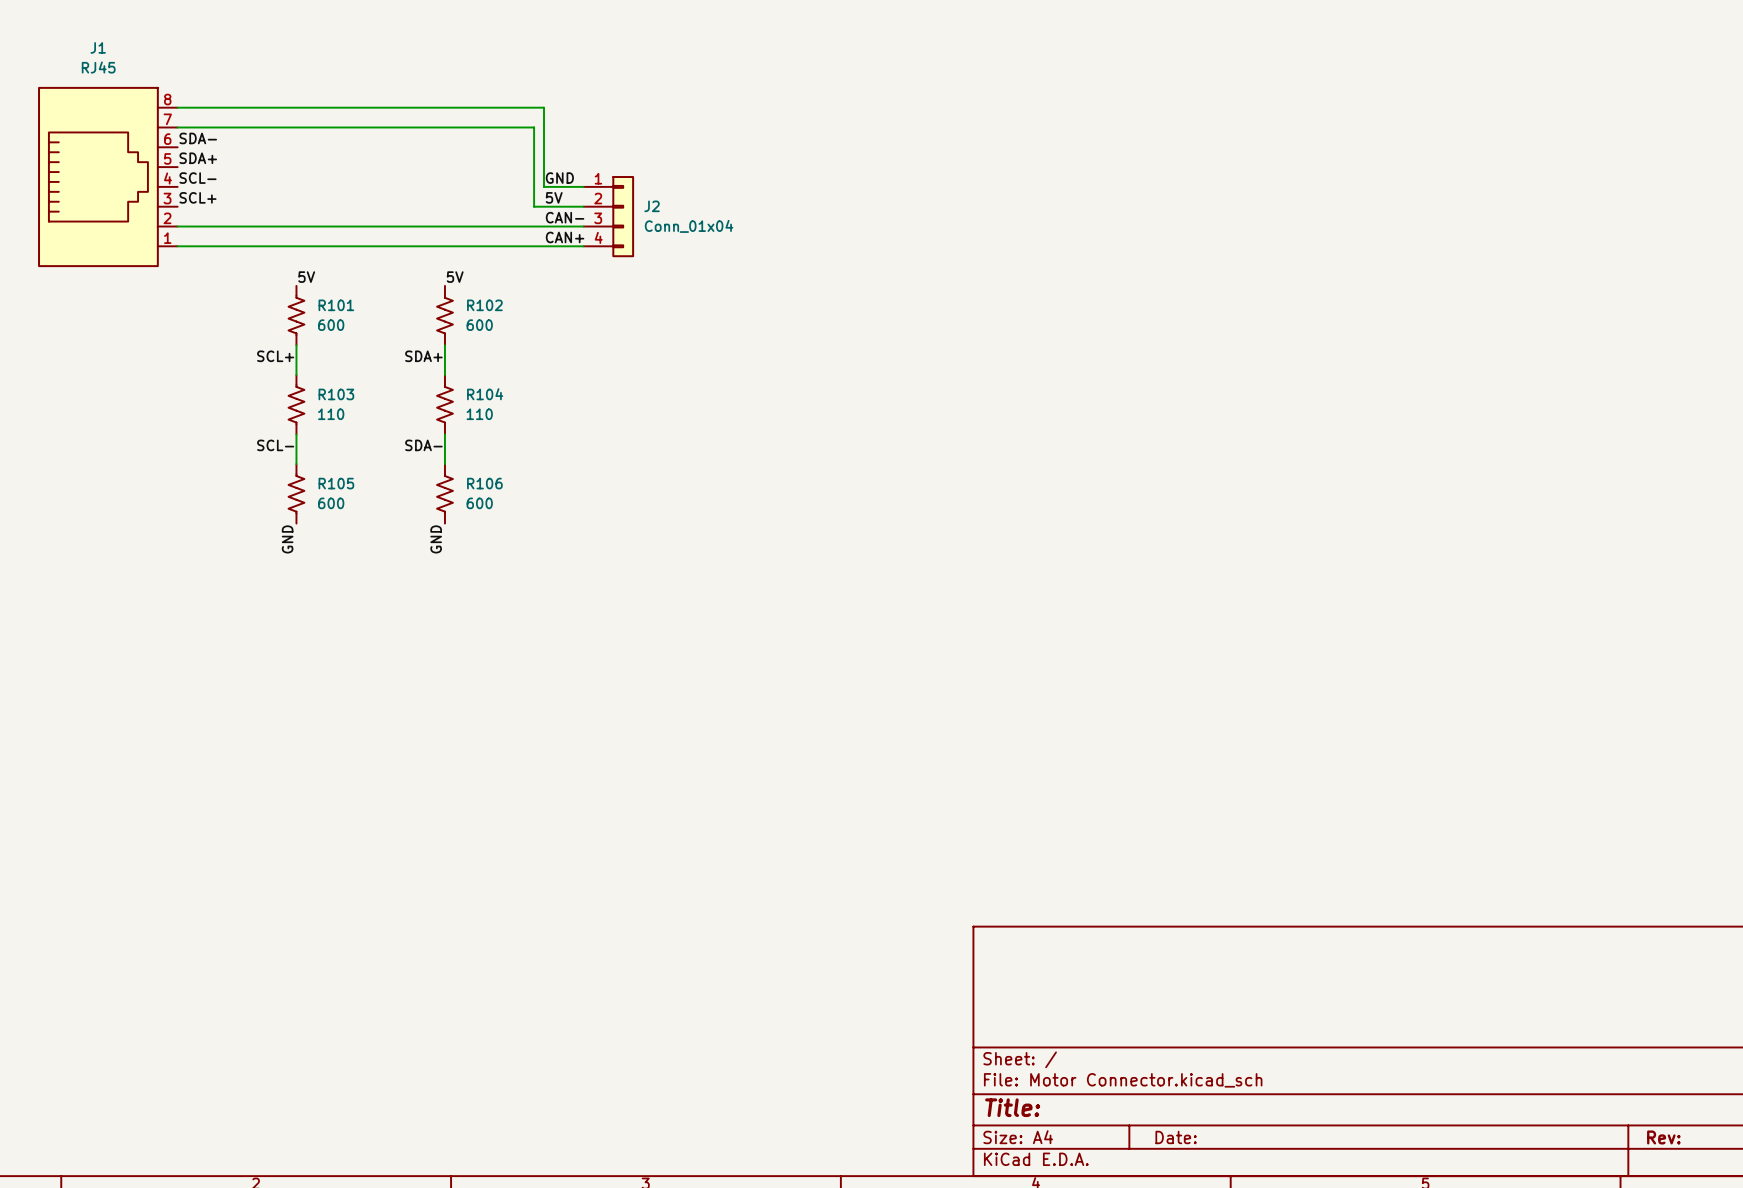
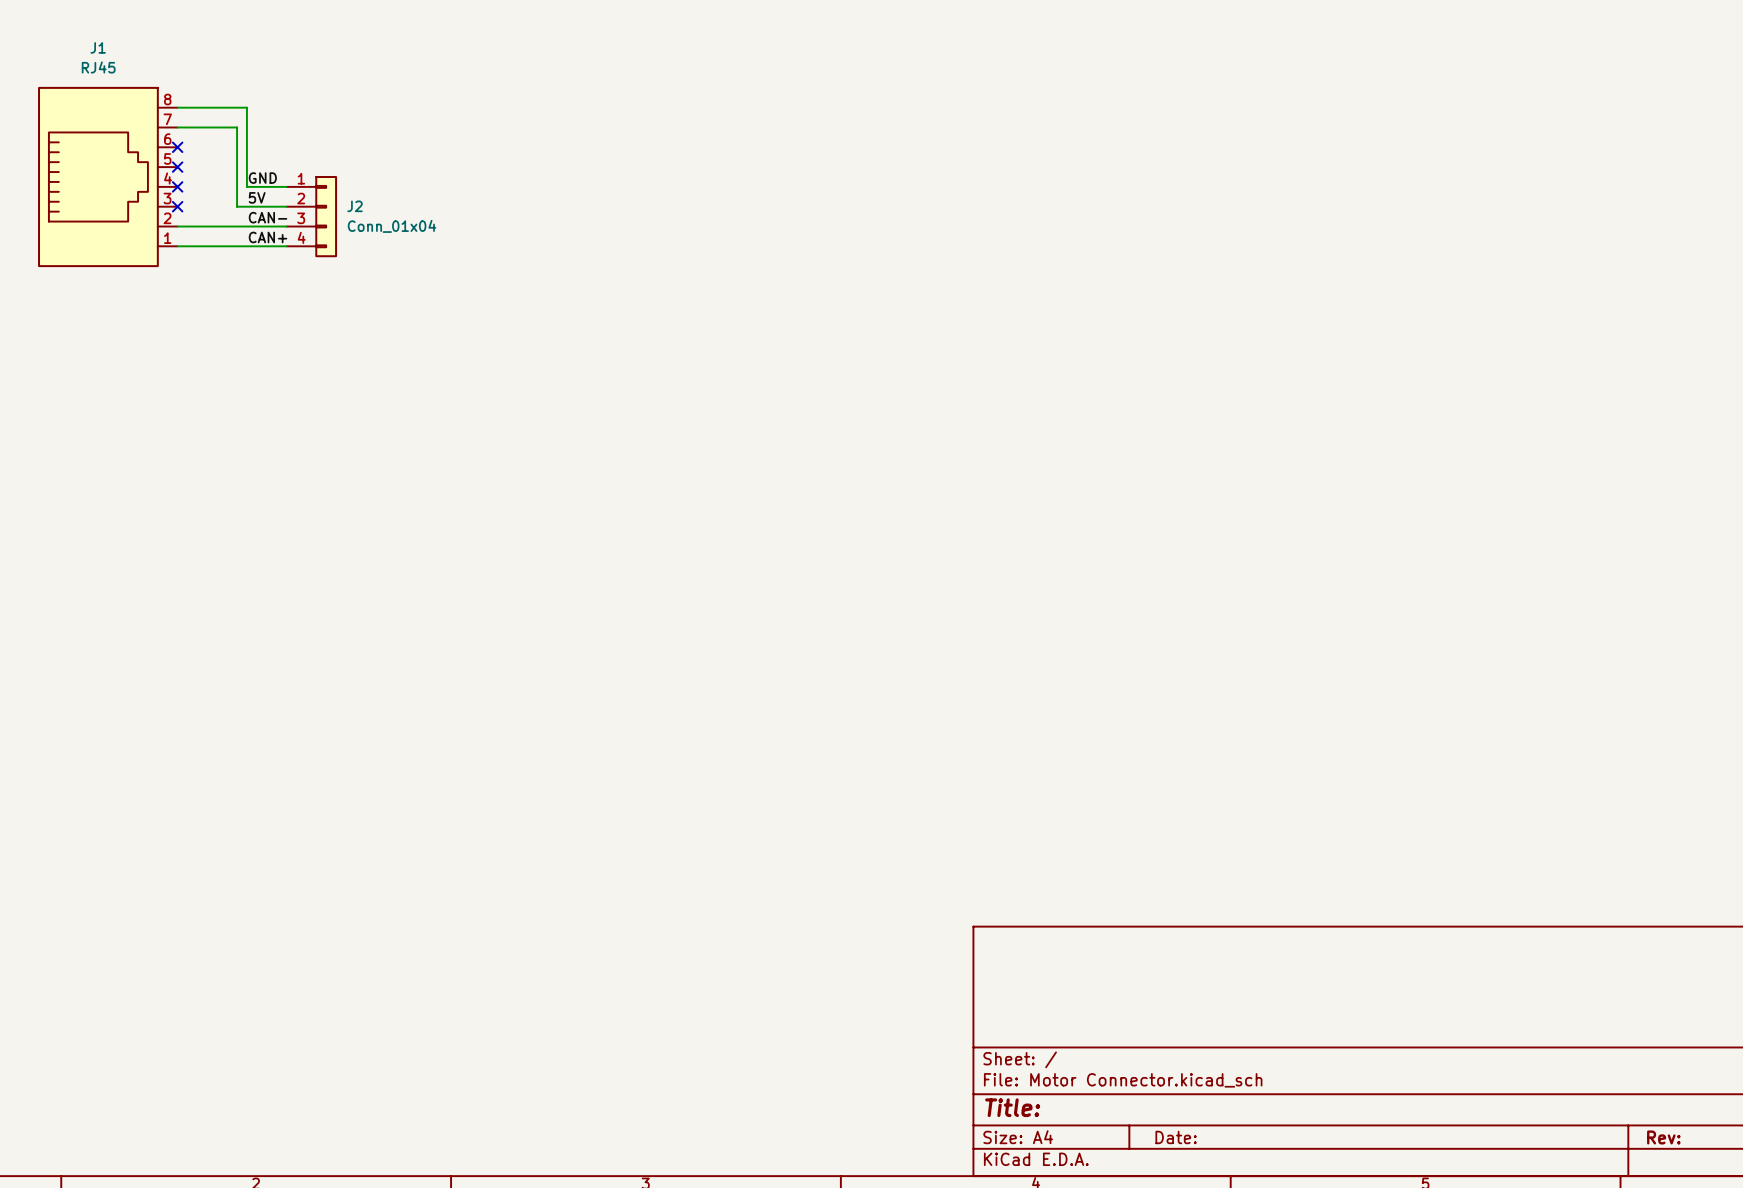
wire: (246, 107) (544, 107) (544, 186) (583, 186) -> (246, 107) (246, 186) (286, 186)
wire: (237, 127) (534, 127) (534, 206) (583, 206) -> (237, 127) (237, 206) (286, 206)
label: SDA- (198, 138) -> none
no-connect mark: none -> (177, 147)
label: SDA+ (198, 158) -> none
no-connect mark: none -> (177, 167)
label: SCL- (197, 178) -> none
label: none -> GND (262, 178)
label: GND (559, 178) -> none
no-connect mark: none -> (177, 186)
label: SCL+ (197, 197) -> none
label: 5V (554, 197) -> none
no-connect mark: none -> (177, 206)
J2 position: (608, 216) -> (311, 216)
label: none -> CAN- (268, 217)
label: CAN- (565, 217) -> none
wire: (286, 226) (583, 226) -> none
label: none -> CAN+ (268, 237)
label: CAN+ (565, 237) -> none
wire: (286, 246) (583, 246) -> none
label position: 5V (306, 277) -> 5V (257, 197)
label: 5V (455, 277) -> none
R101: 600 (296, 315) -> none
R102: 600 (444, 315) -> none
wire: (296, 345) (296, 375) -> none
wire: (444, 345) (444, 375) -> none
label: SCL+ (275, 356) -> none
label: SDA+ (423, 356) -> none
R103: 110 (296, 404) -> none
R104: 110 (444, 404) -> none
wire: (296, 434) (296, 464) -> none
wire: (444, 434) (444, 464) -> none
label: SCL- (275, 445) -> none
label: SDA- (423, 445) -> none
R105: 600 (296, 493) -> none
R106: 600 (444, 493) -> none
label: GND (287, 539) -> none
label: GND (436, 539) -> none

